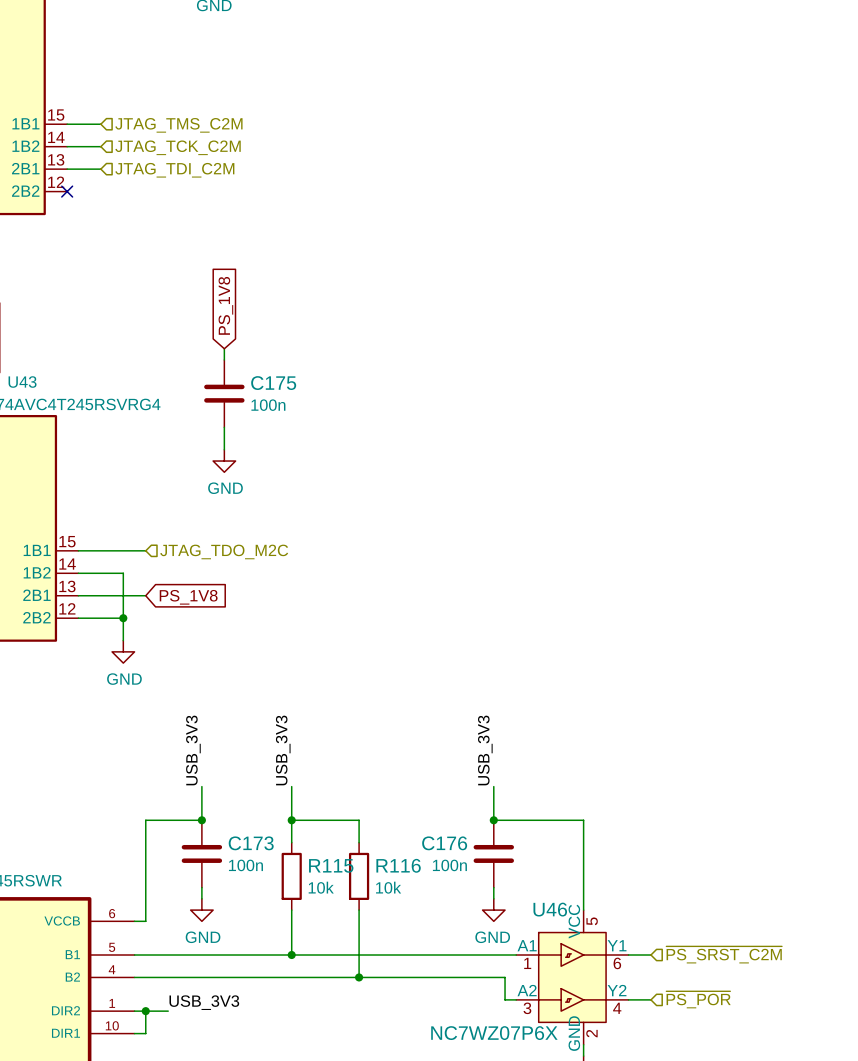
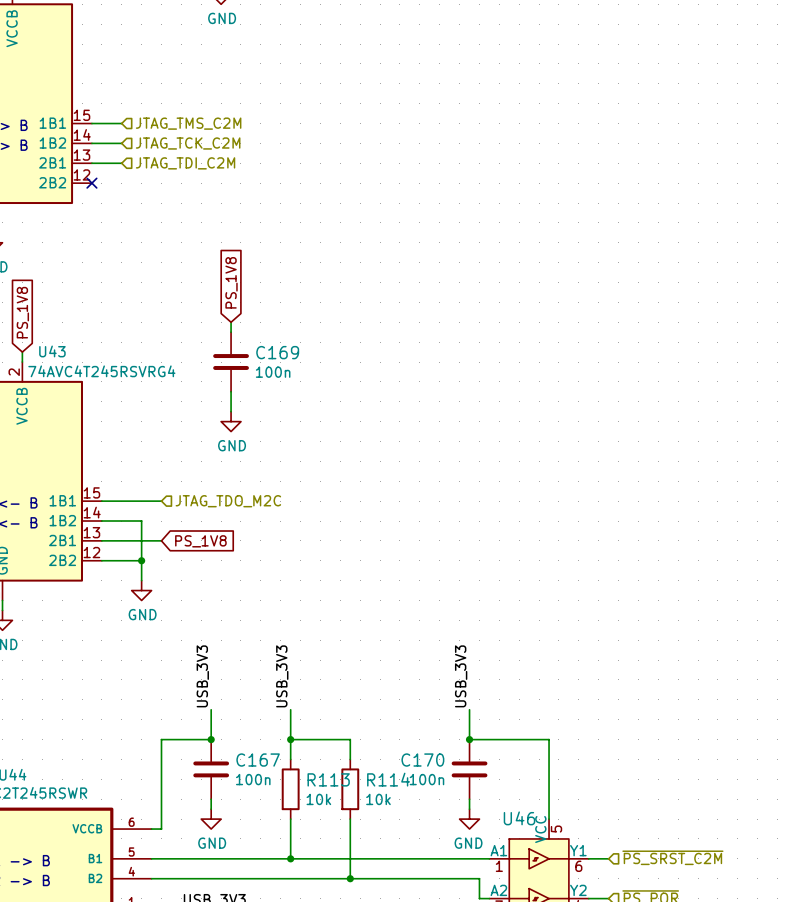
C175 name: C175 (273, 383) -> C169 (277, 352)
C173 name: C173 (251, 843) -> C167 (258, 760)
C176 name: C176 (444, 843) -> C170 (422, 760)
R115 name: R115 (331, 865) -> R113 (328, 779)
R116 name: R116 (398, 865) -> R114 (388, 779)

